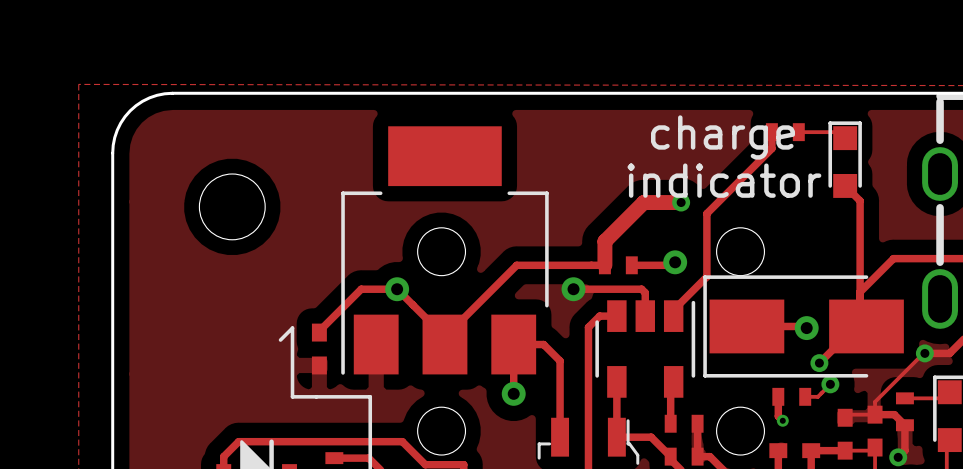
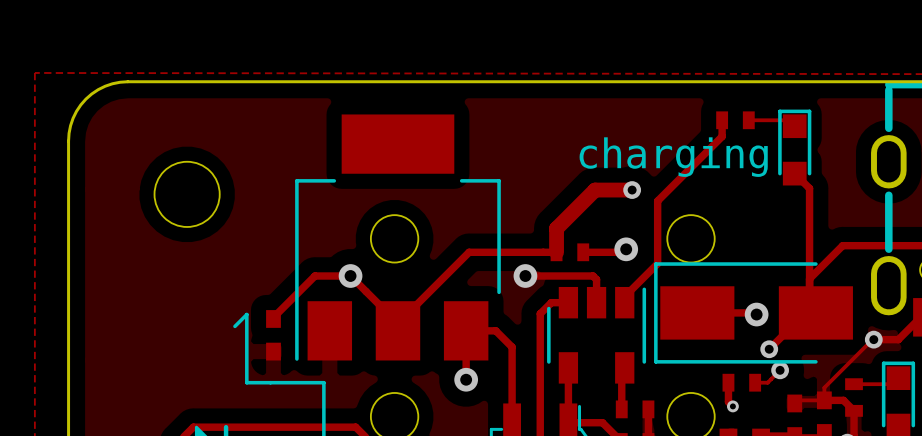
text: charge (723, 137) -> none
text: indicator (724, 180) -> charging (673, 157)

